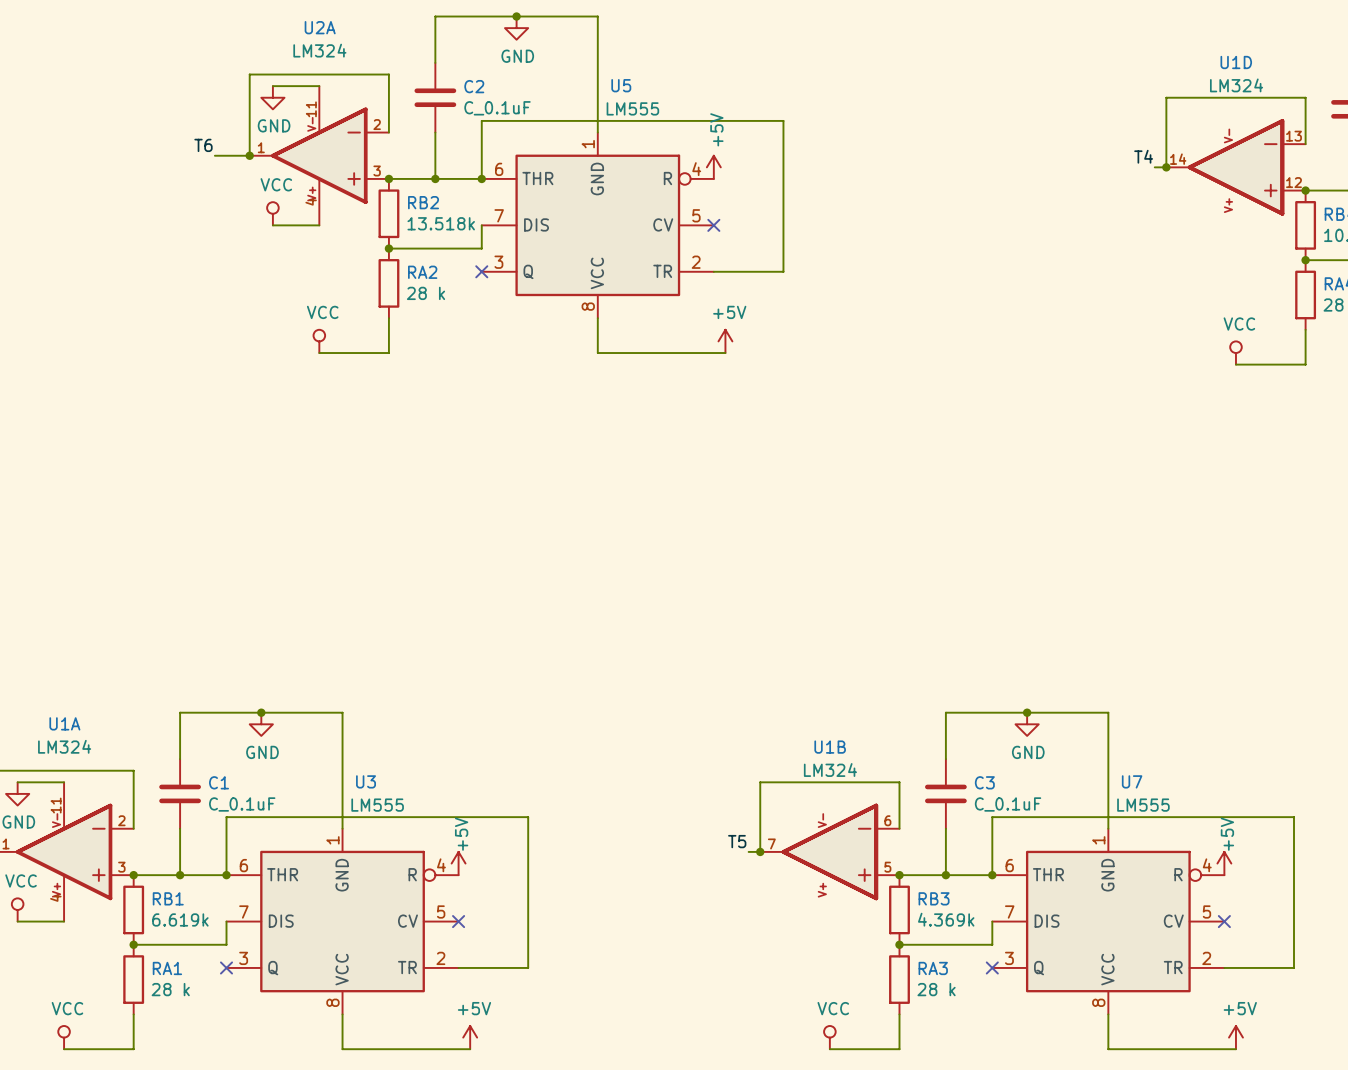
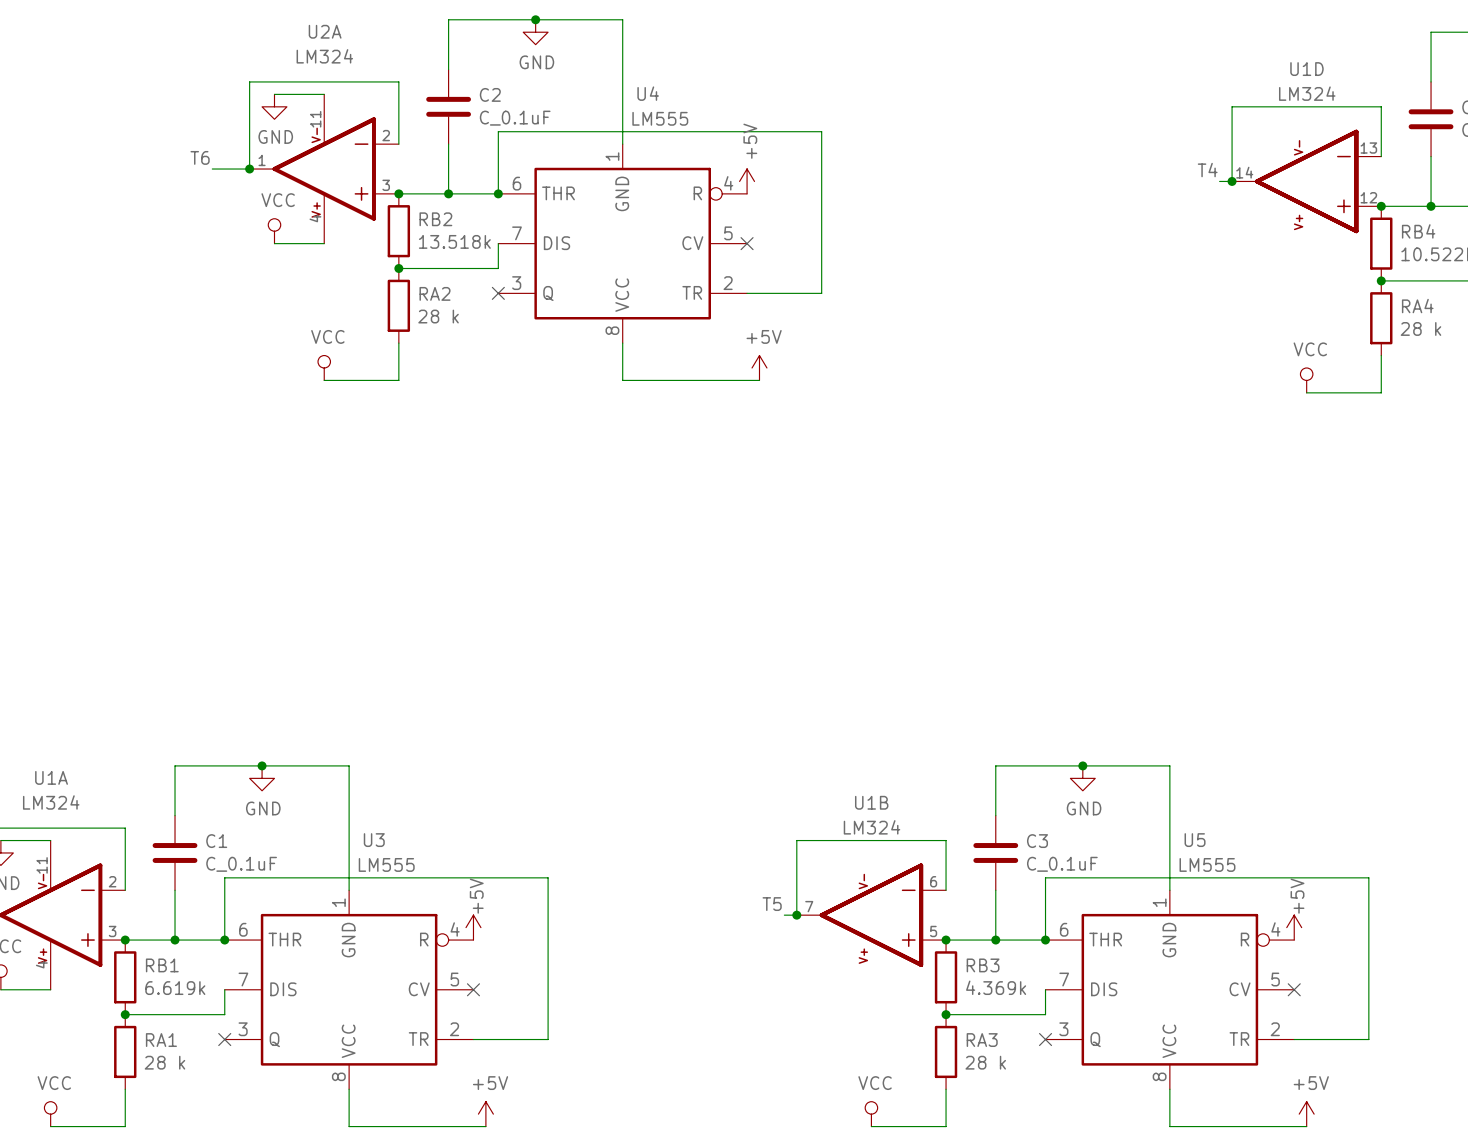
U5 name: U5 (621, 85) -> U4 (648, 93)
U7 name: U7 (1132, 781) -> U5 (1195, 840)

